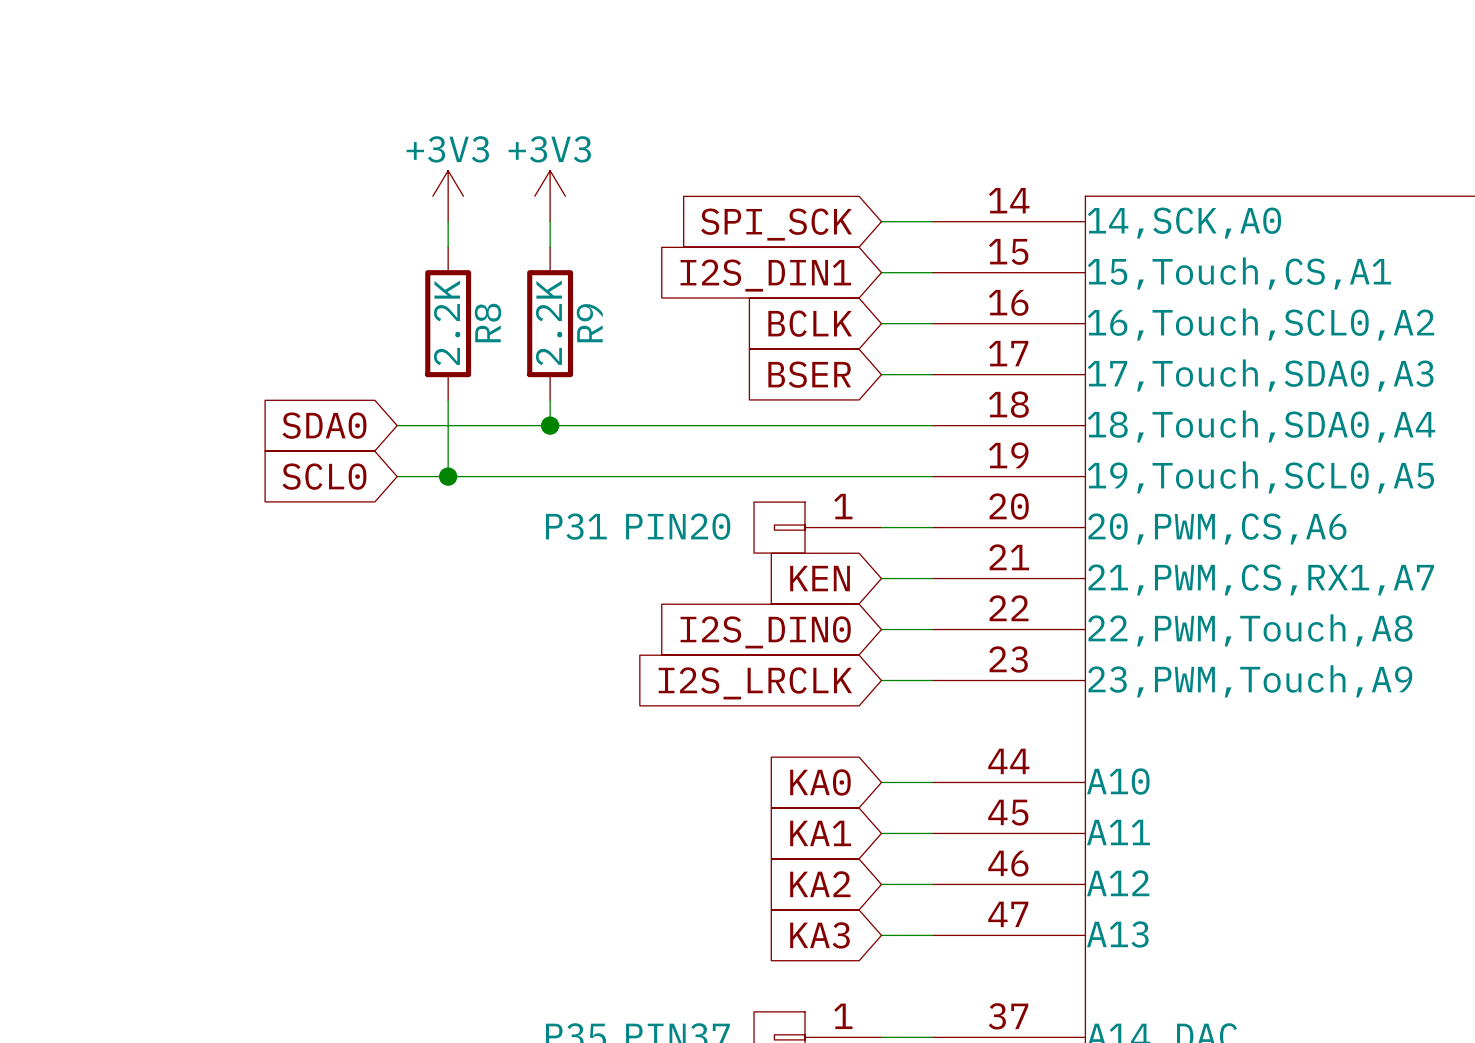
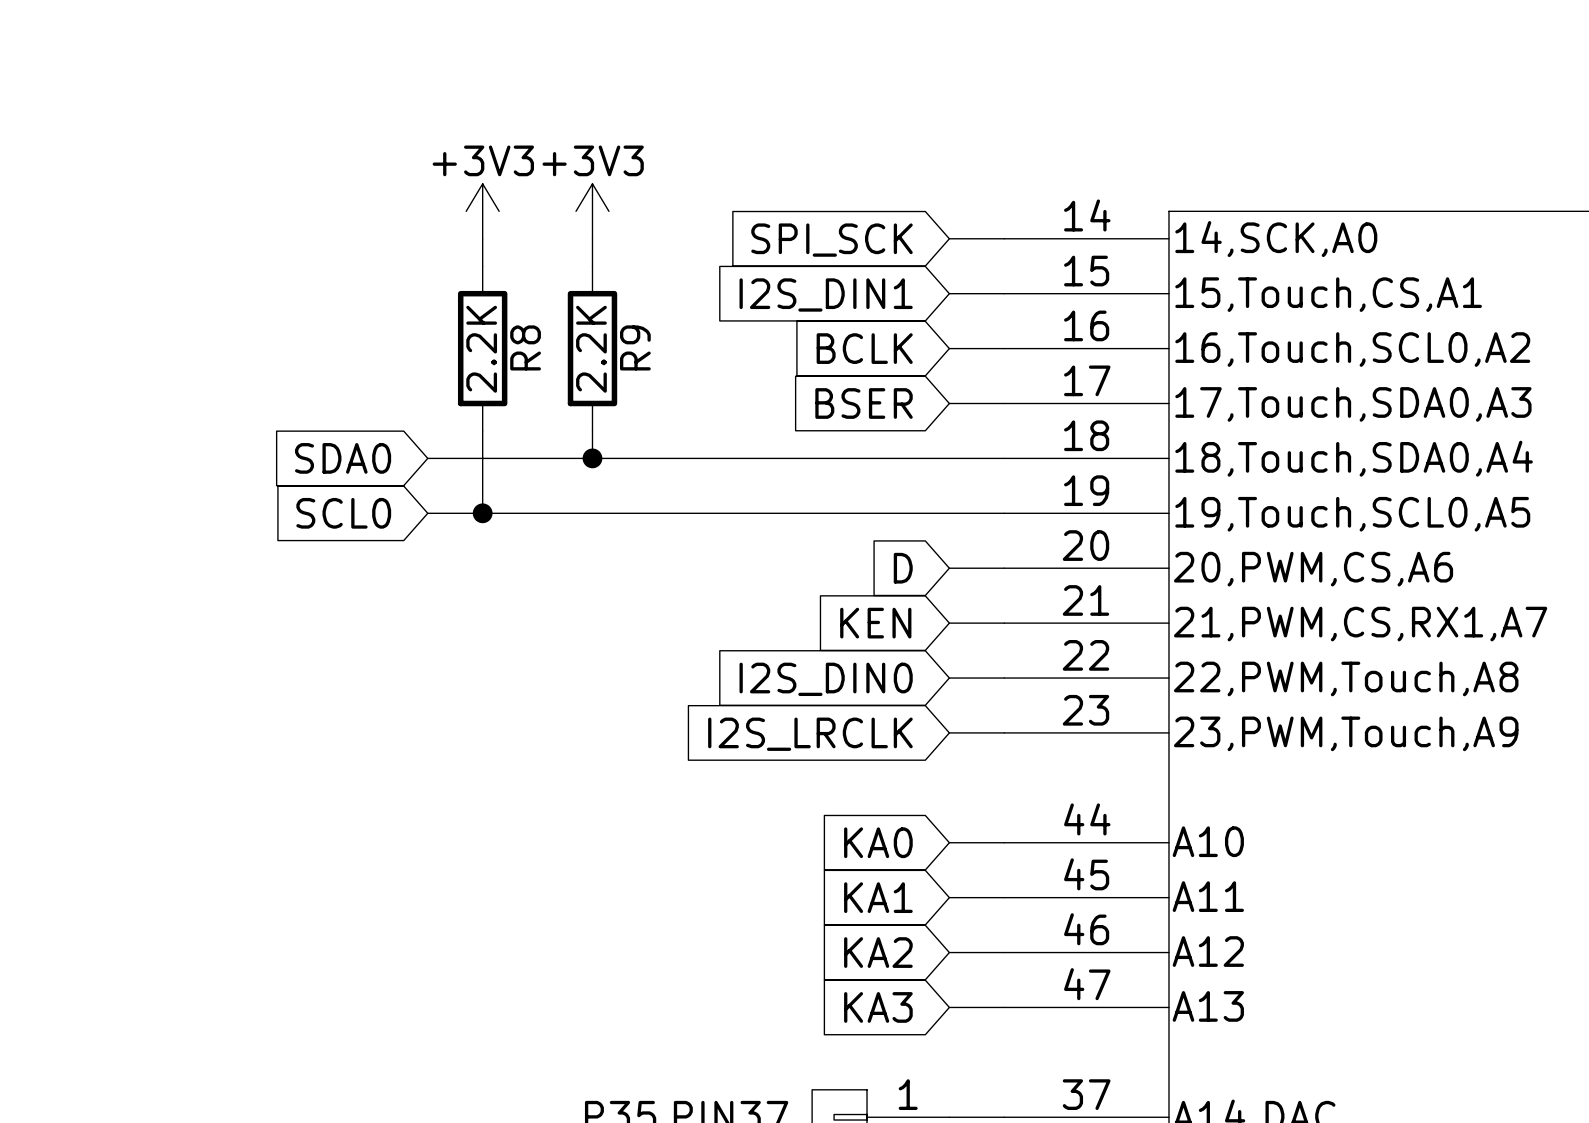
P31: PIN20 (817, 527) -> none
global label: none -> D (903, 568)

